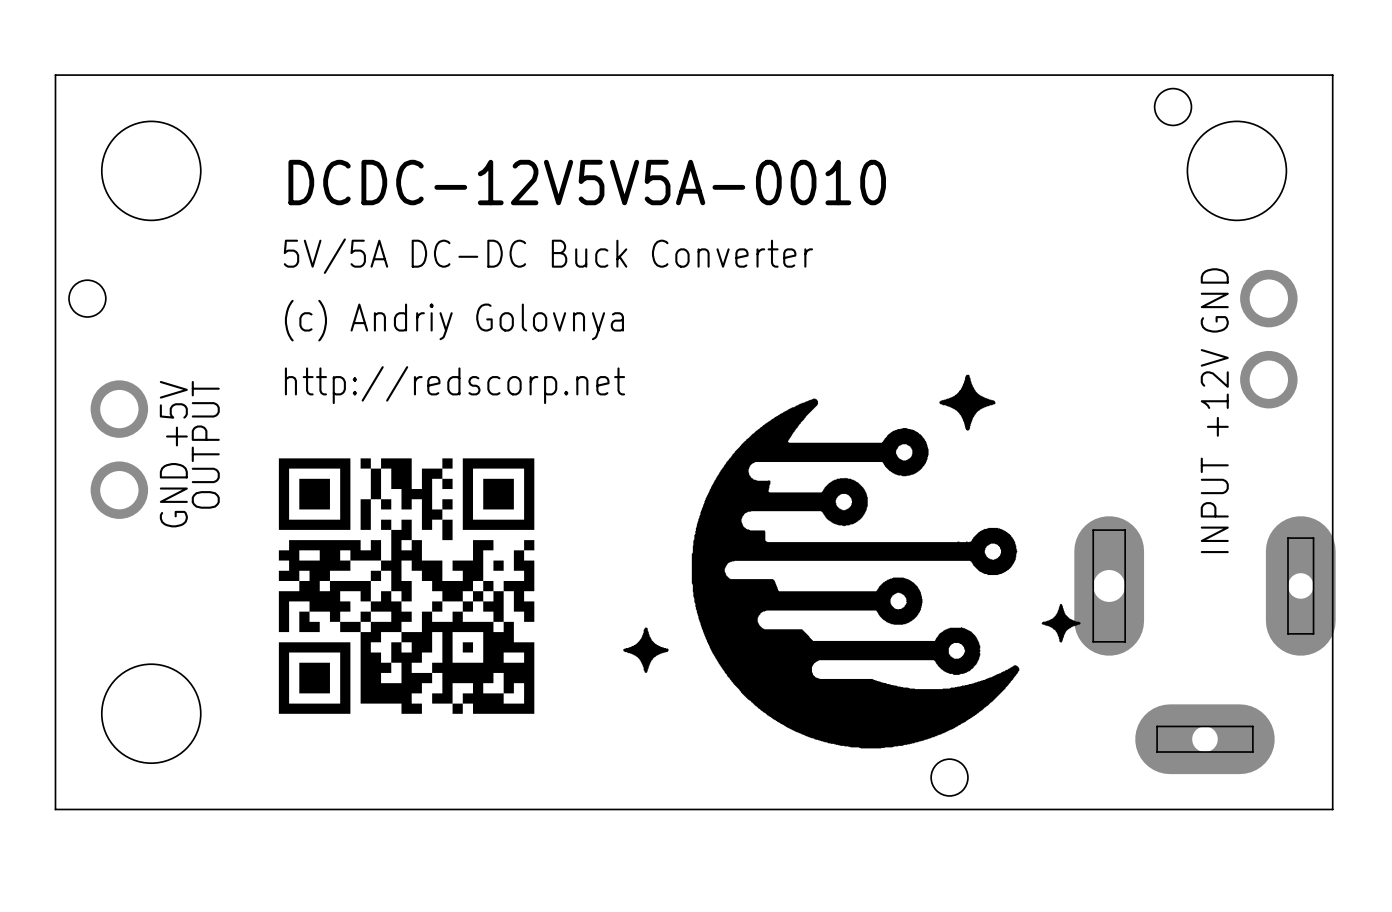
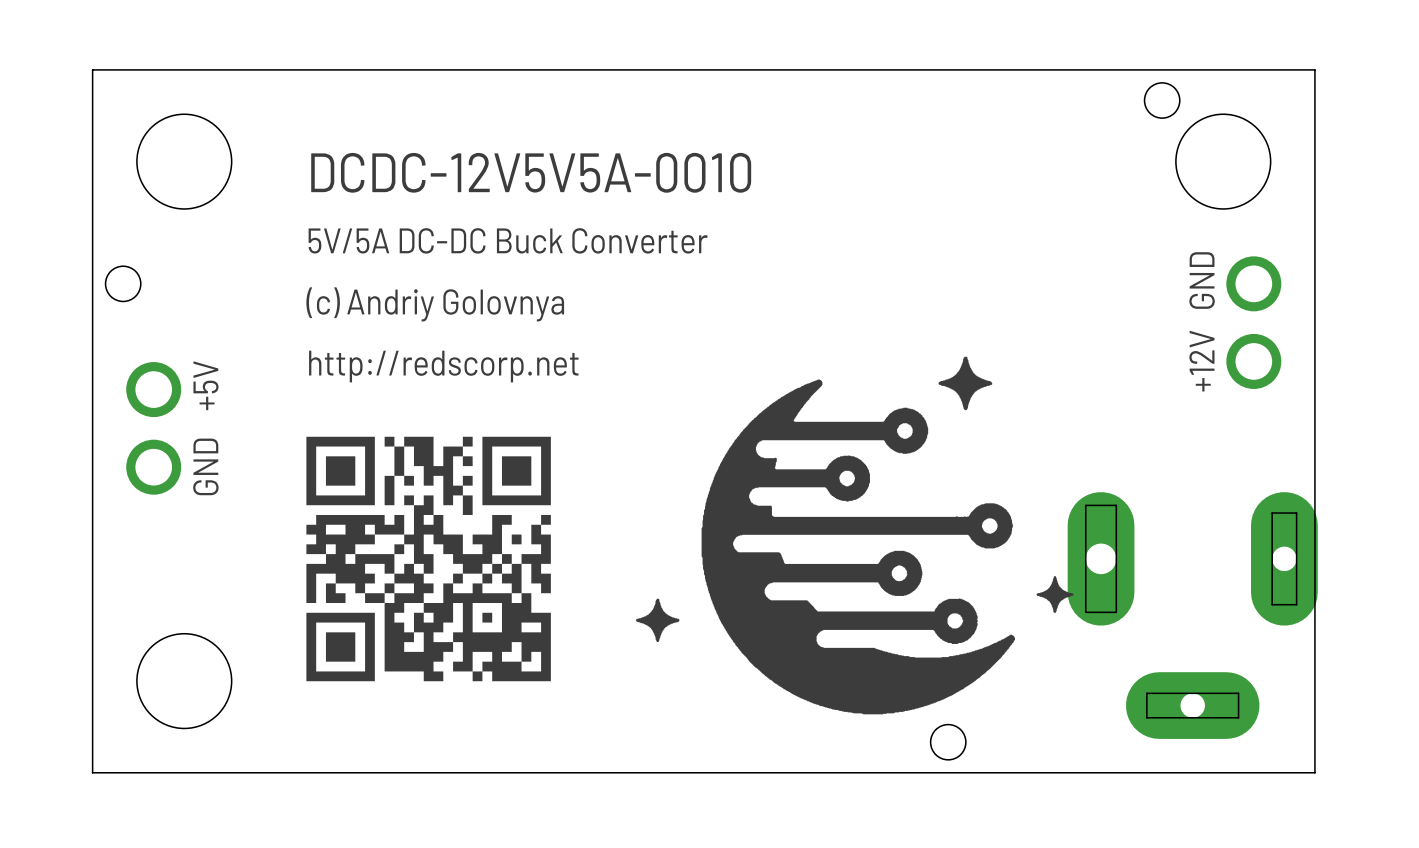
text: OUTPUT (205, 444) -> none
text: INPUT (1214, 505) -> none

